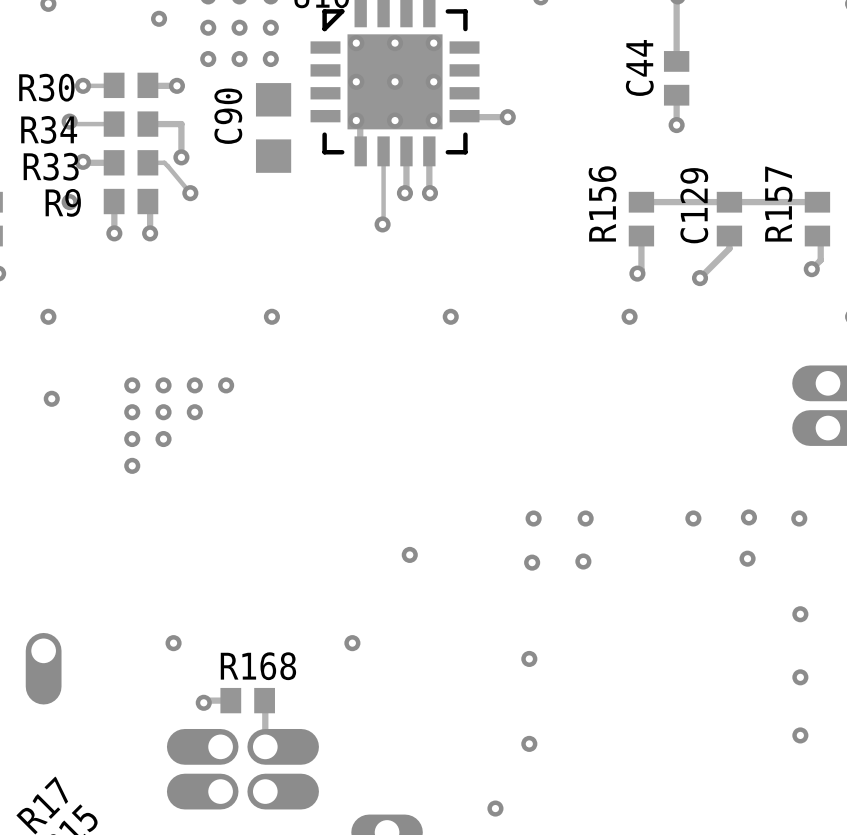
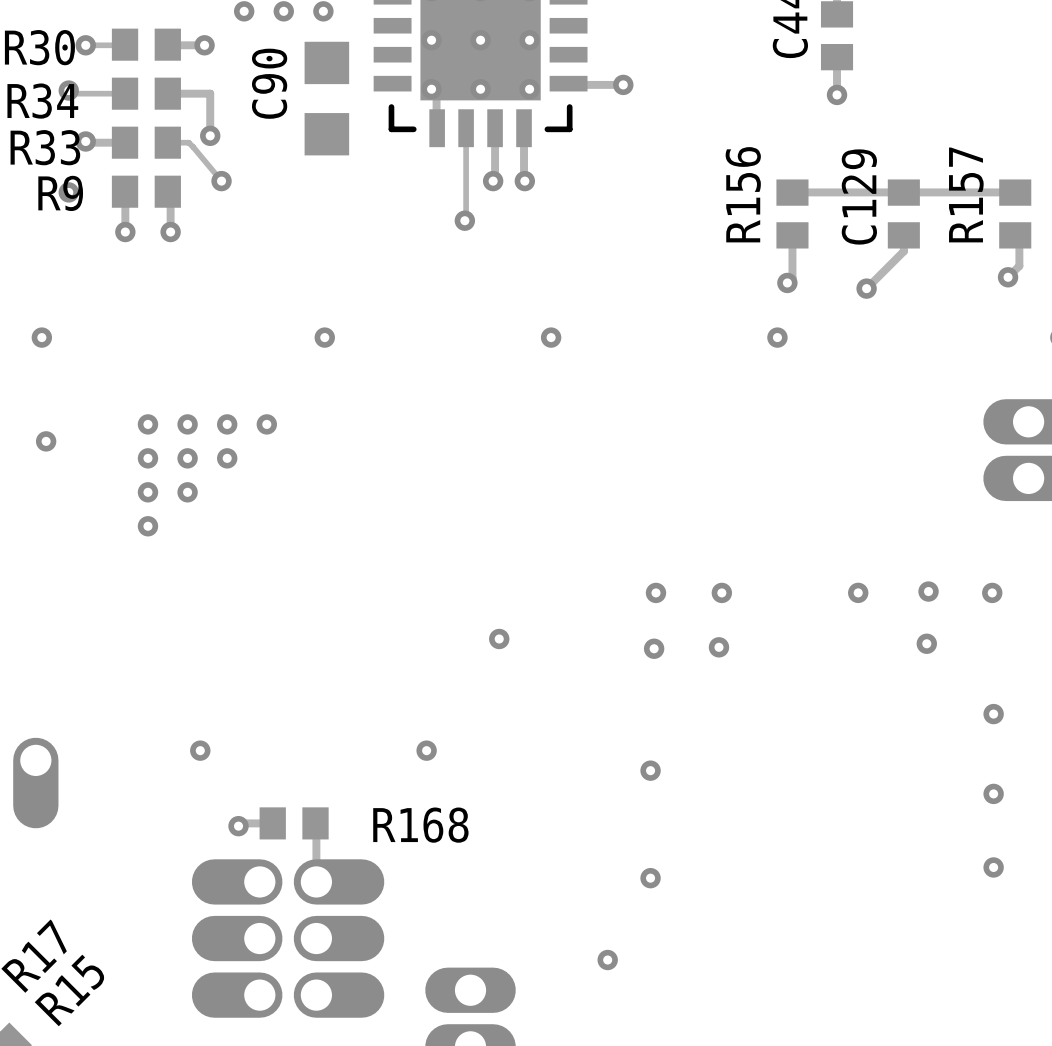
R168 name position: R168 (258, 666) -> R168 (420, 825)

